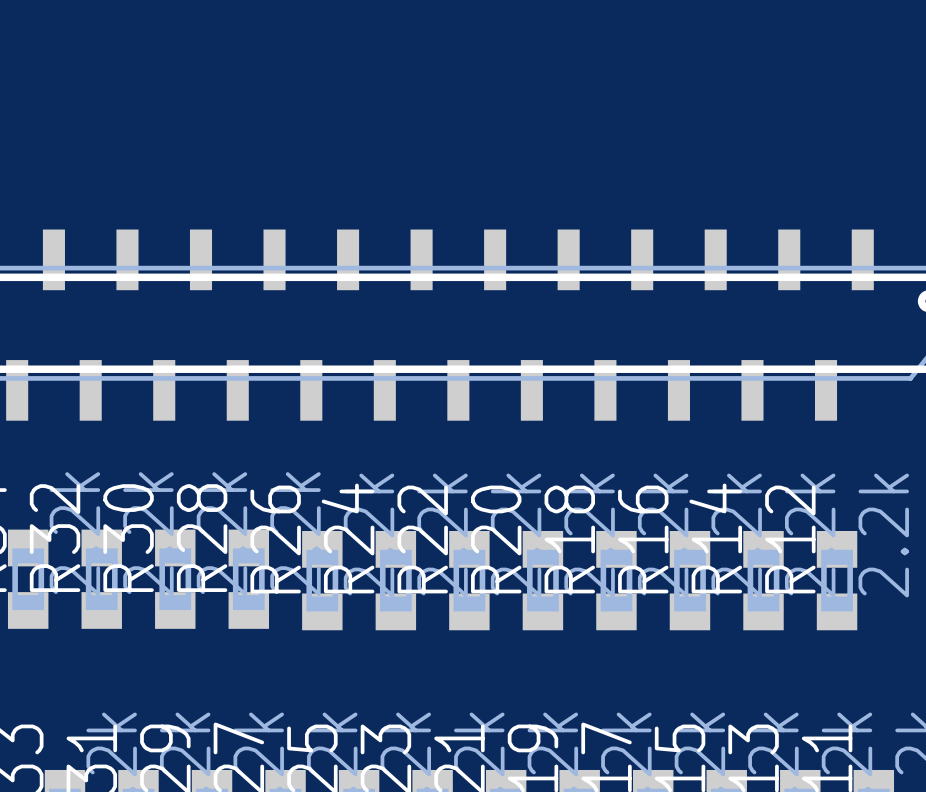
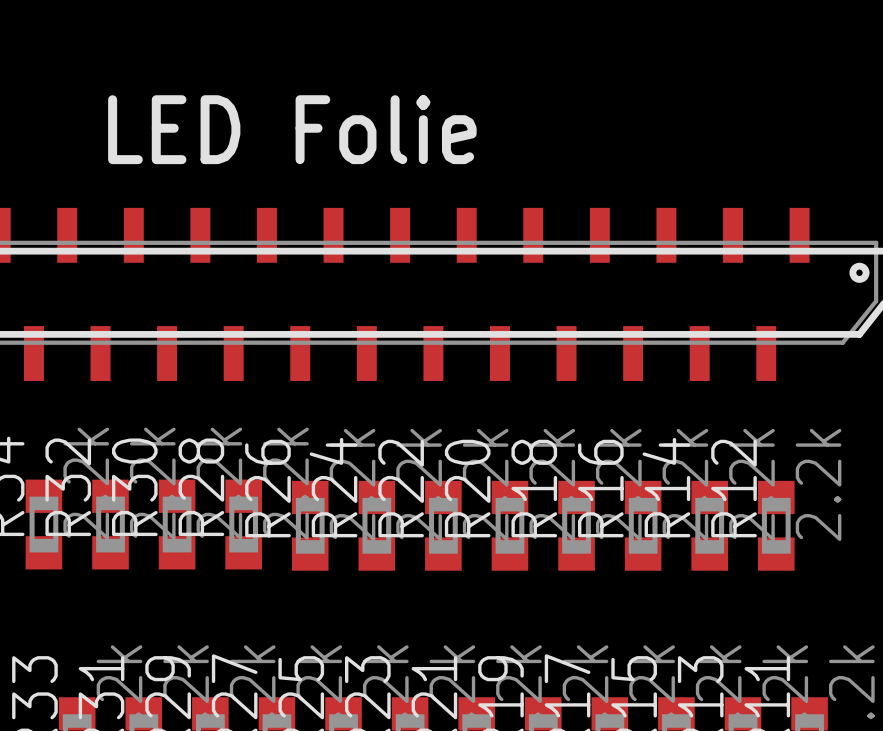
text: none -> LED Folie (292, 129)

